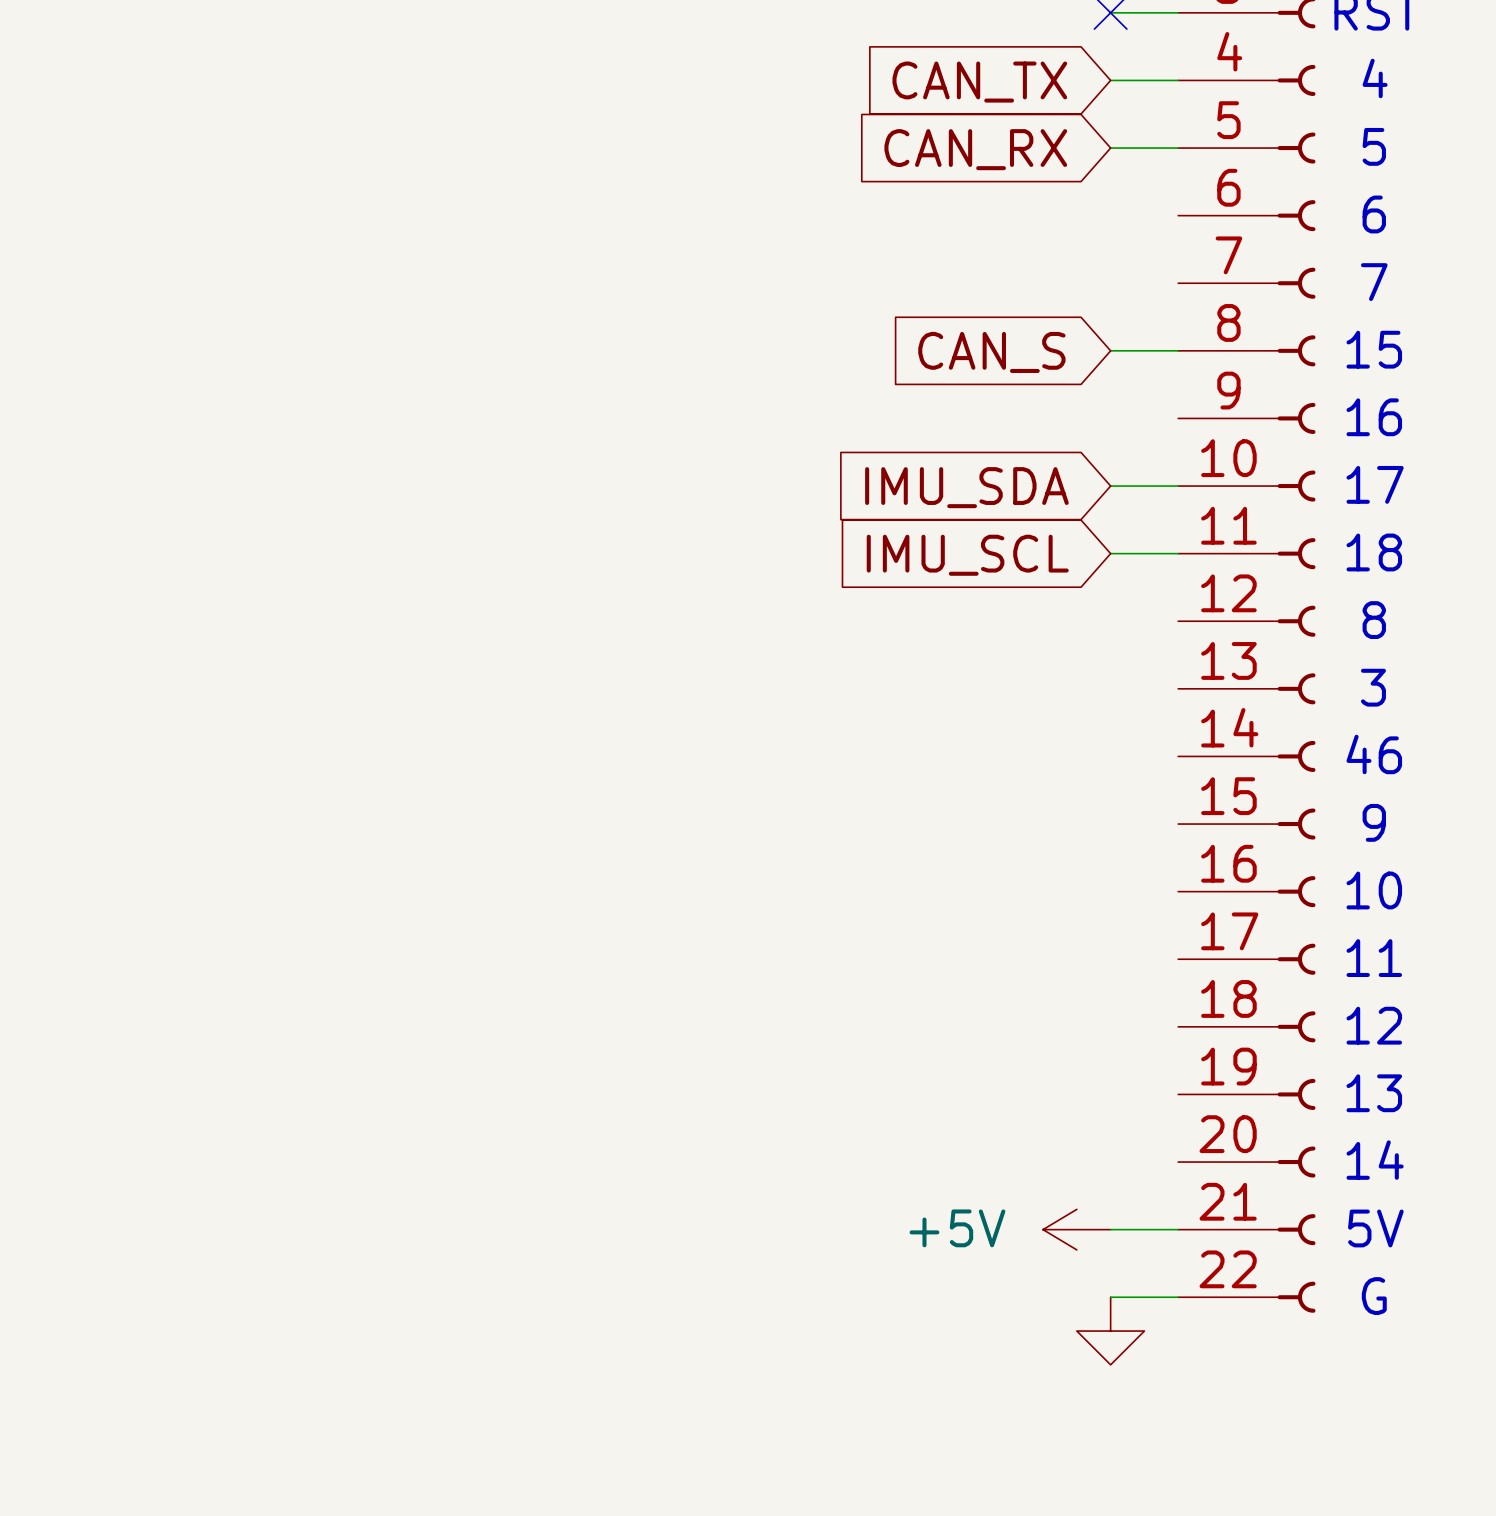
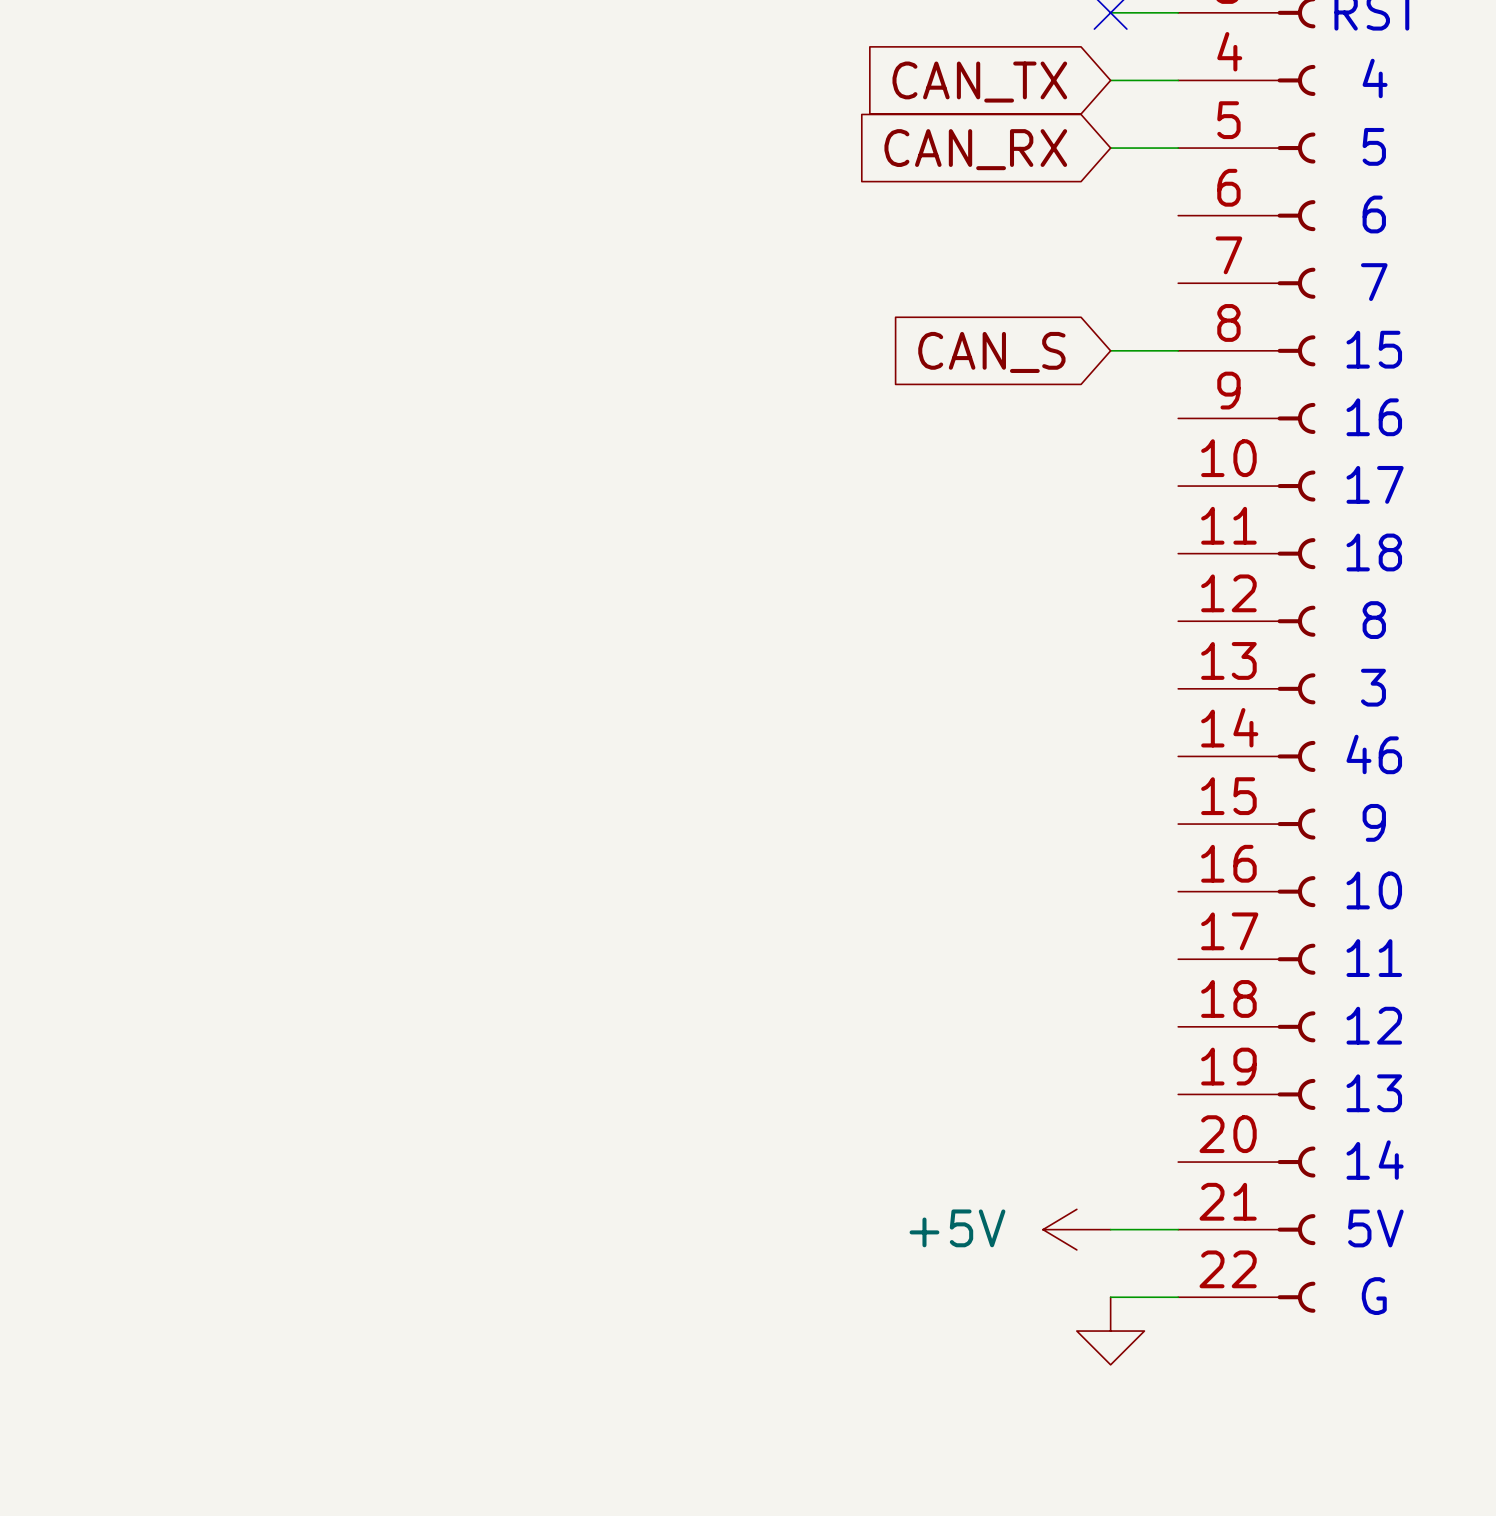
wire: (1110, 486) (1178, 486) -> none
global label: IMU_SDA (966, 487) -> none
wire: (1110, 553) (1178, 553) -> none
global label: IMU_SCL (967, 555) -> none

